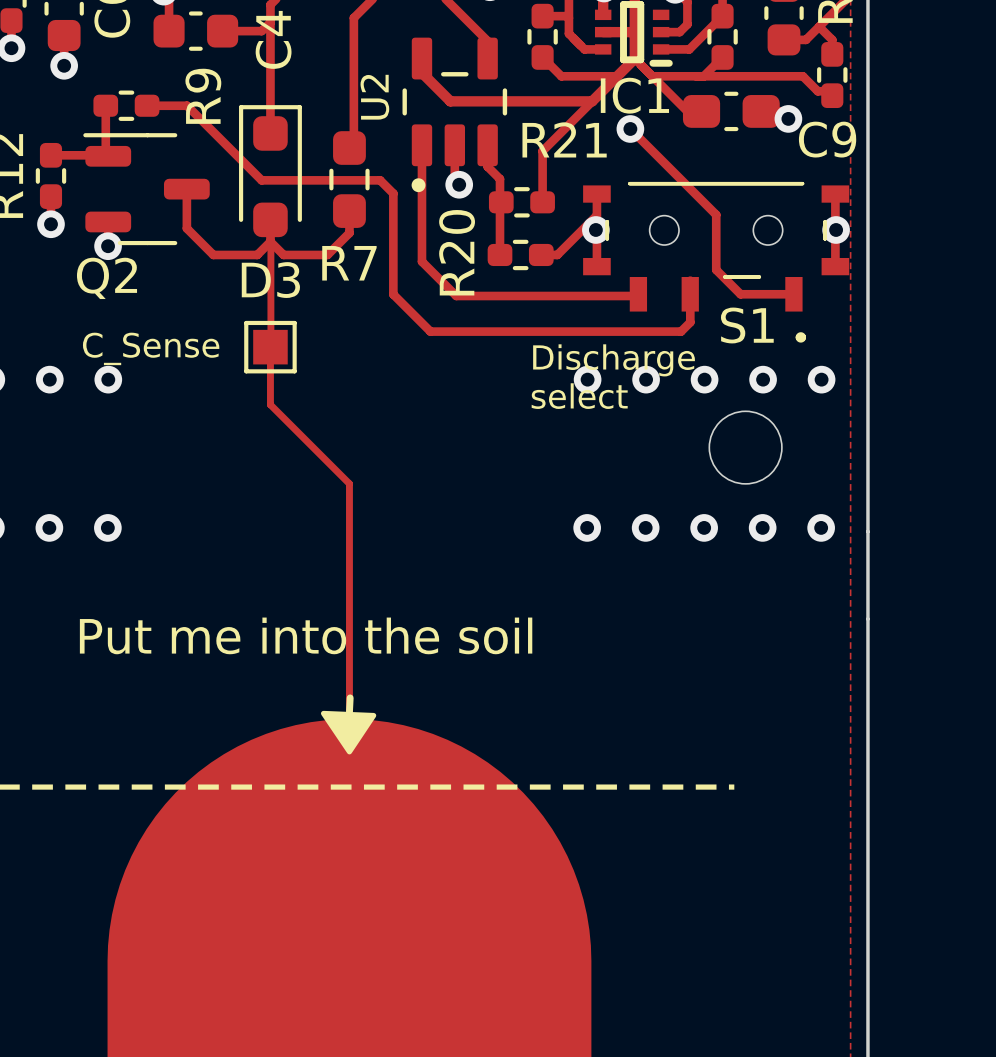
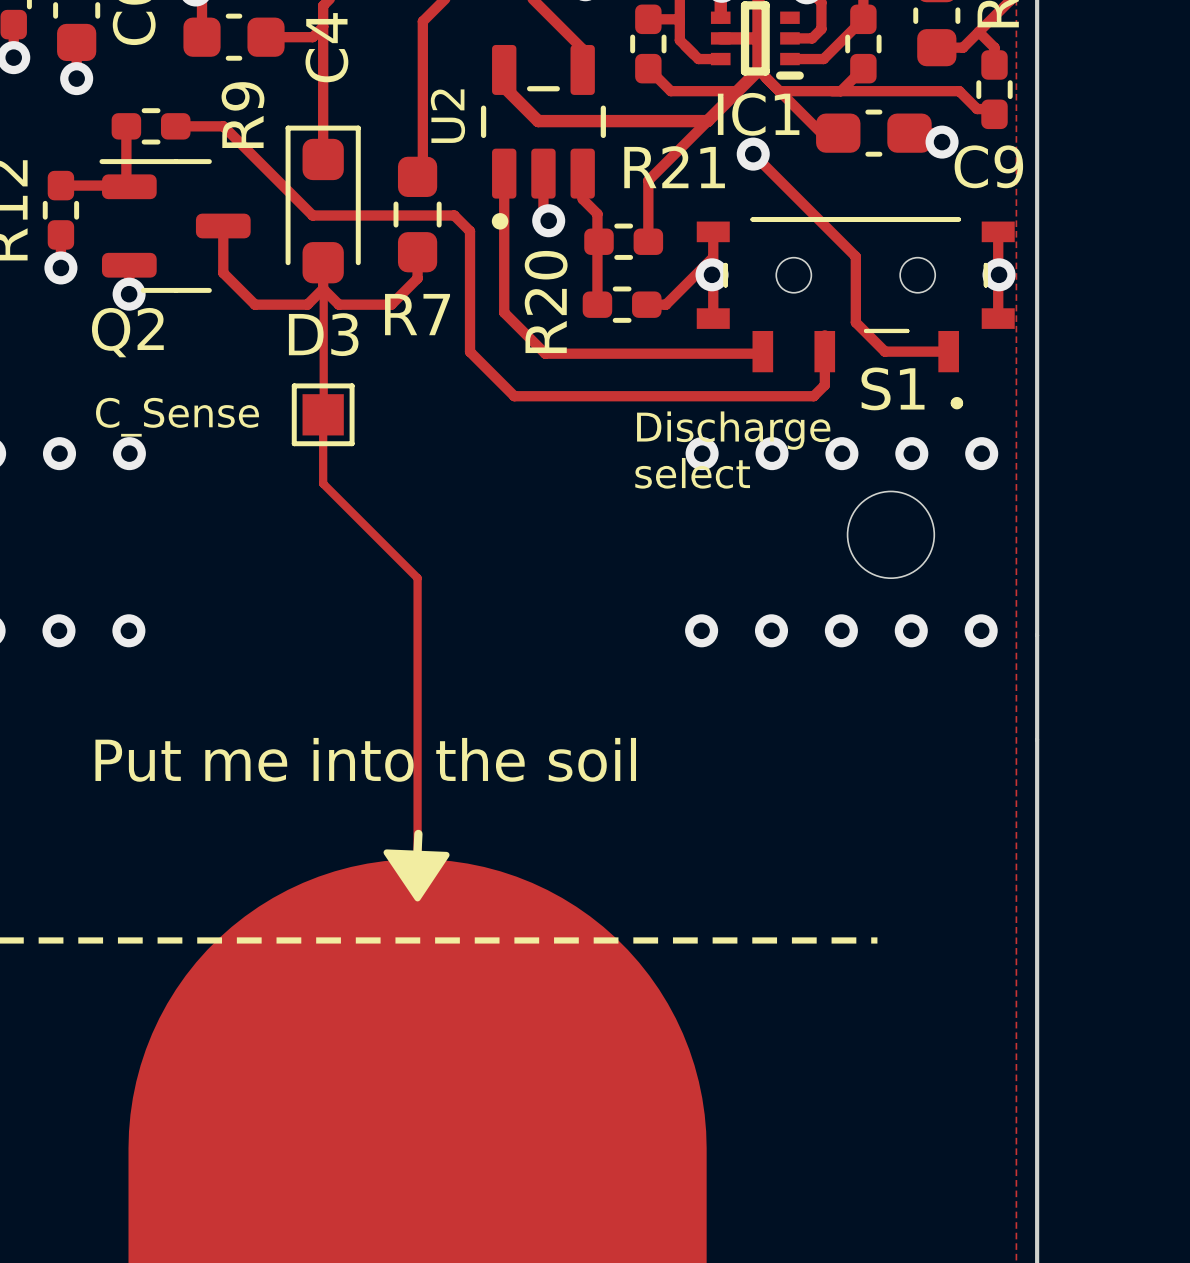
C_Sense name: C_Sense (151, 348) -> none
text: none -> C_Sense (177, 417)

